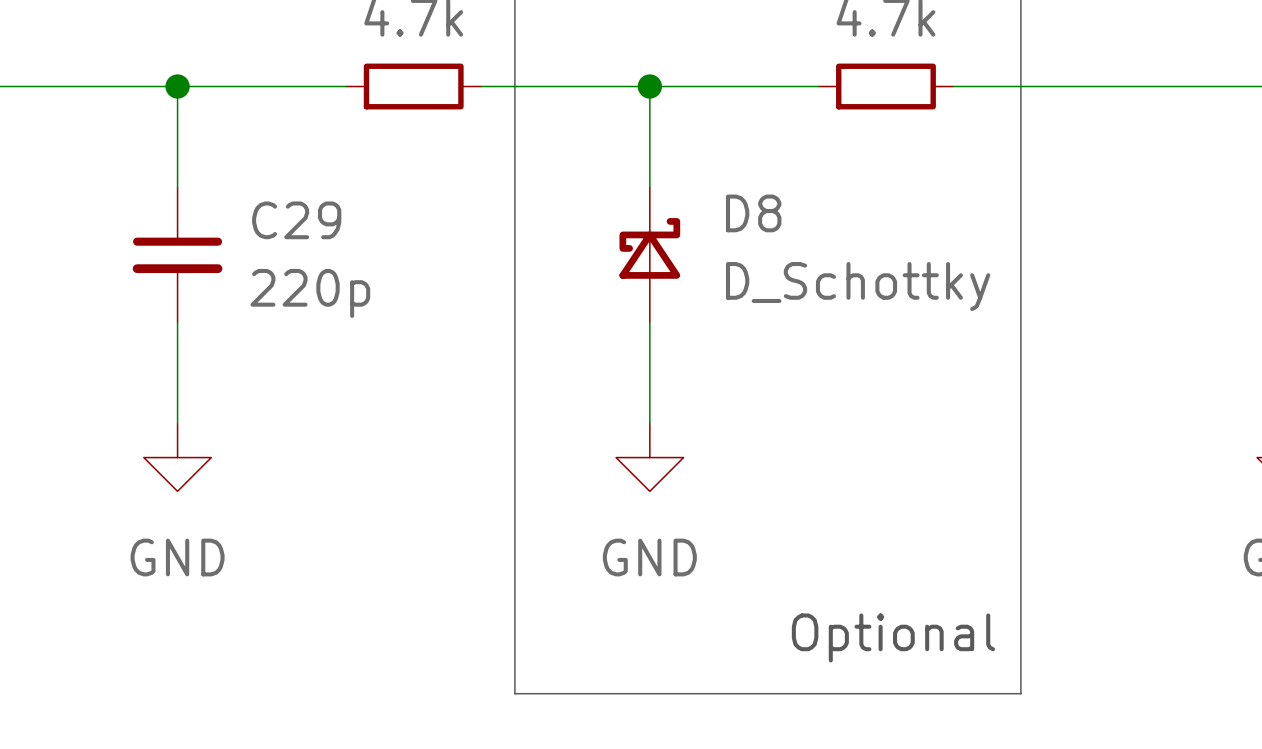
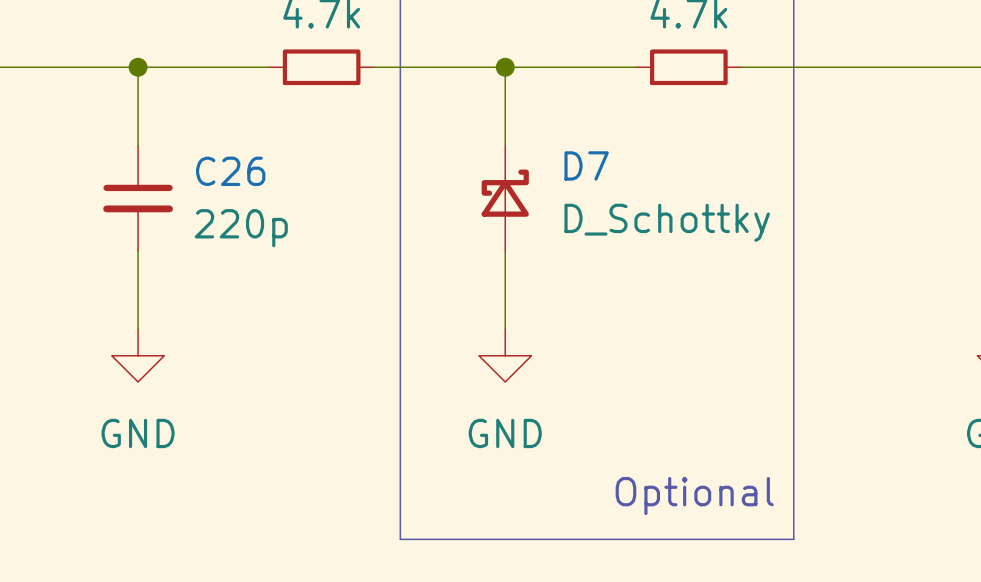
D8 name: D8 (753, 213) -> D7 (586, 165)
C29 name: C29 (296, 220) -> C26 (230, 171)

